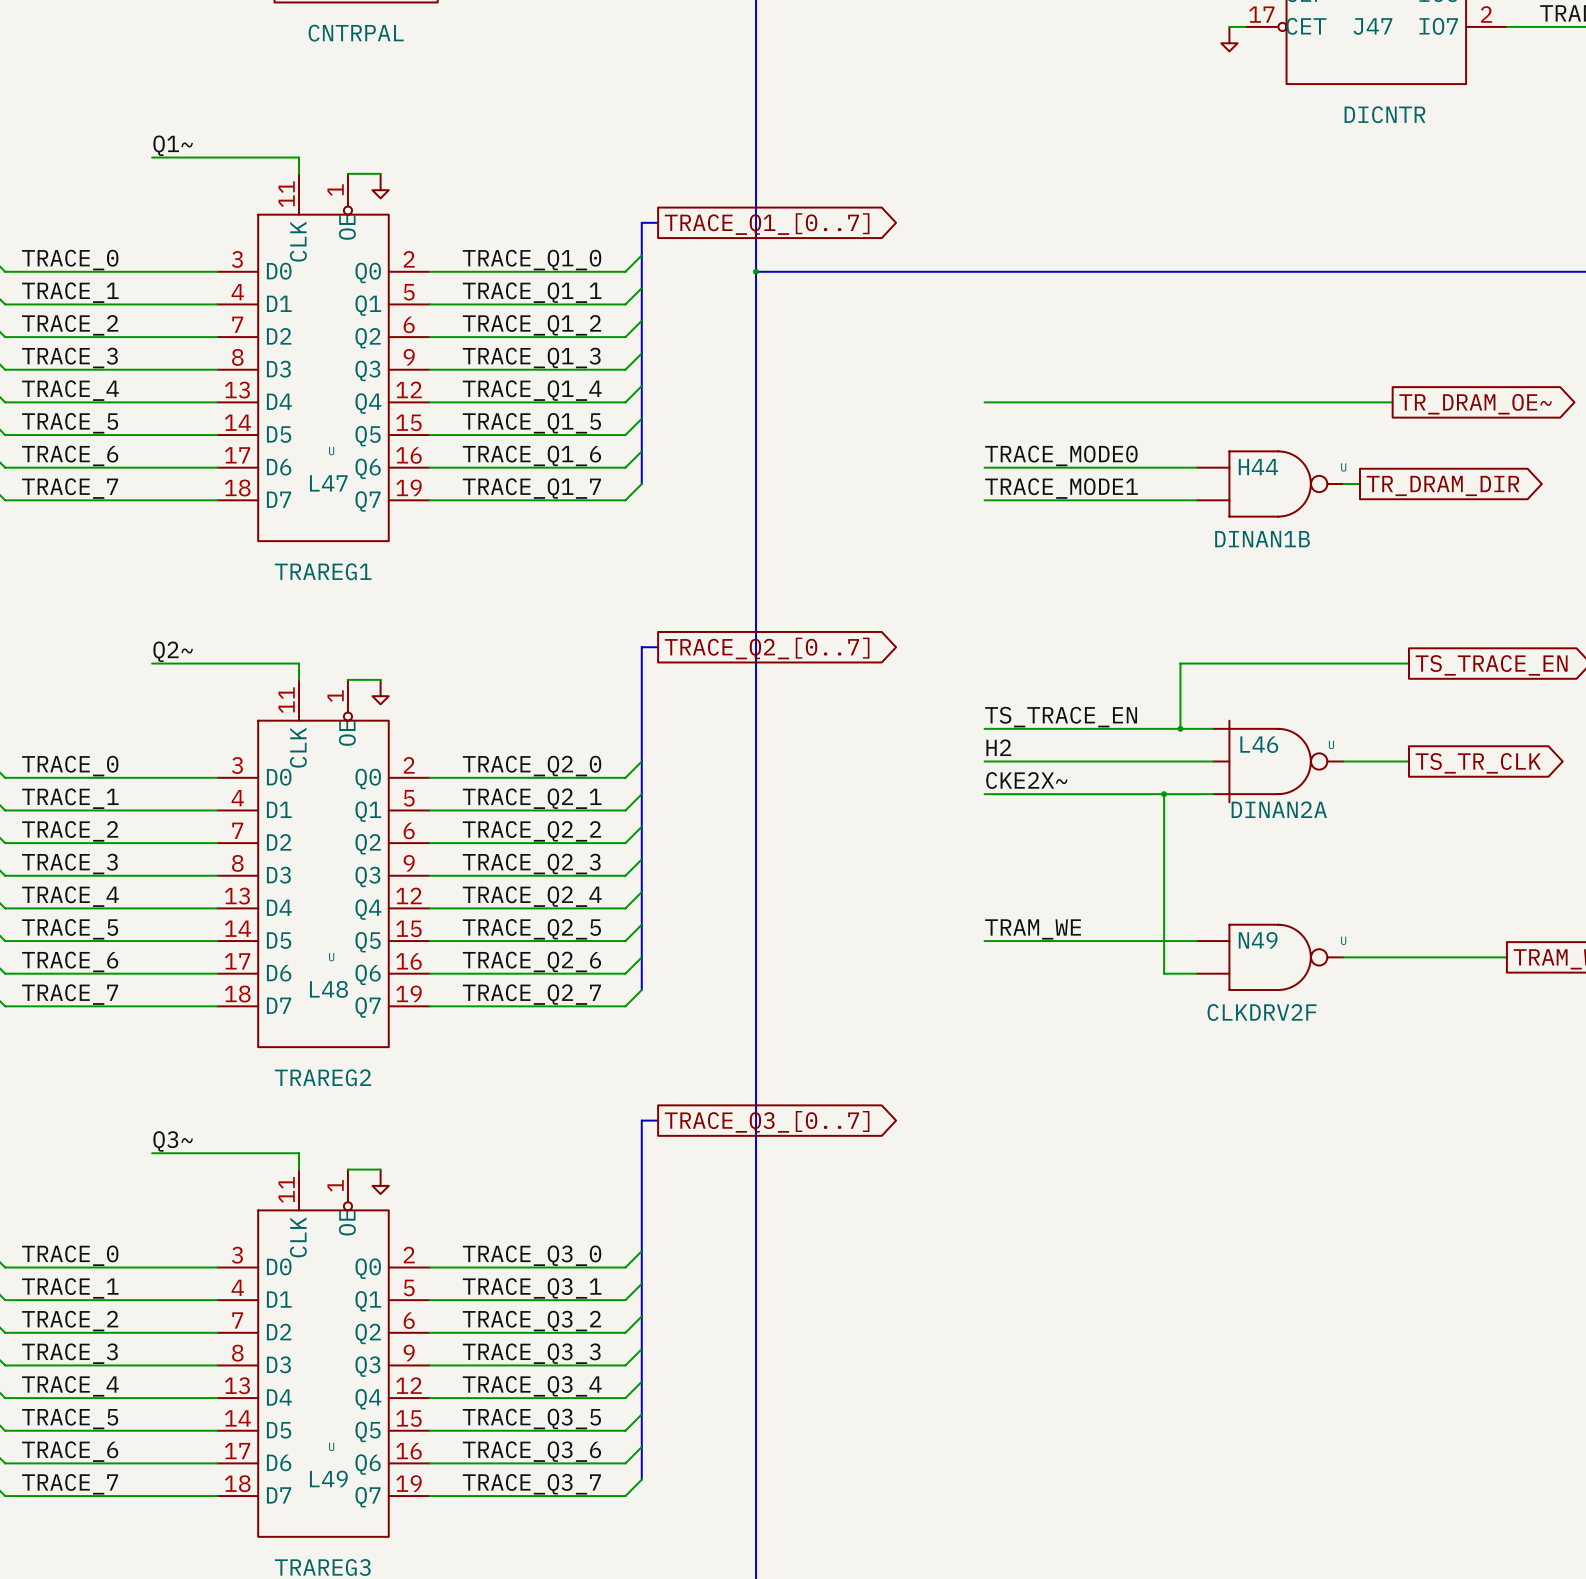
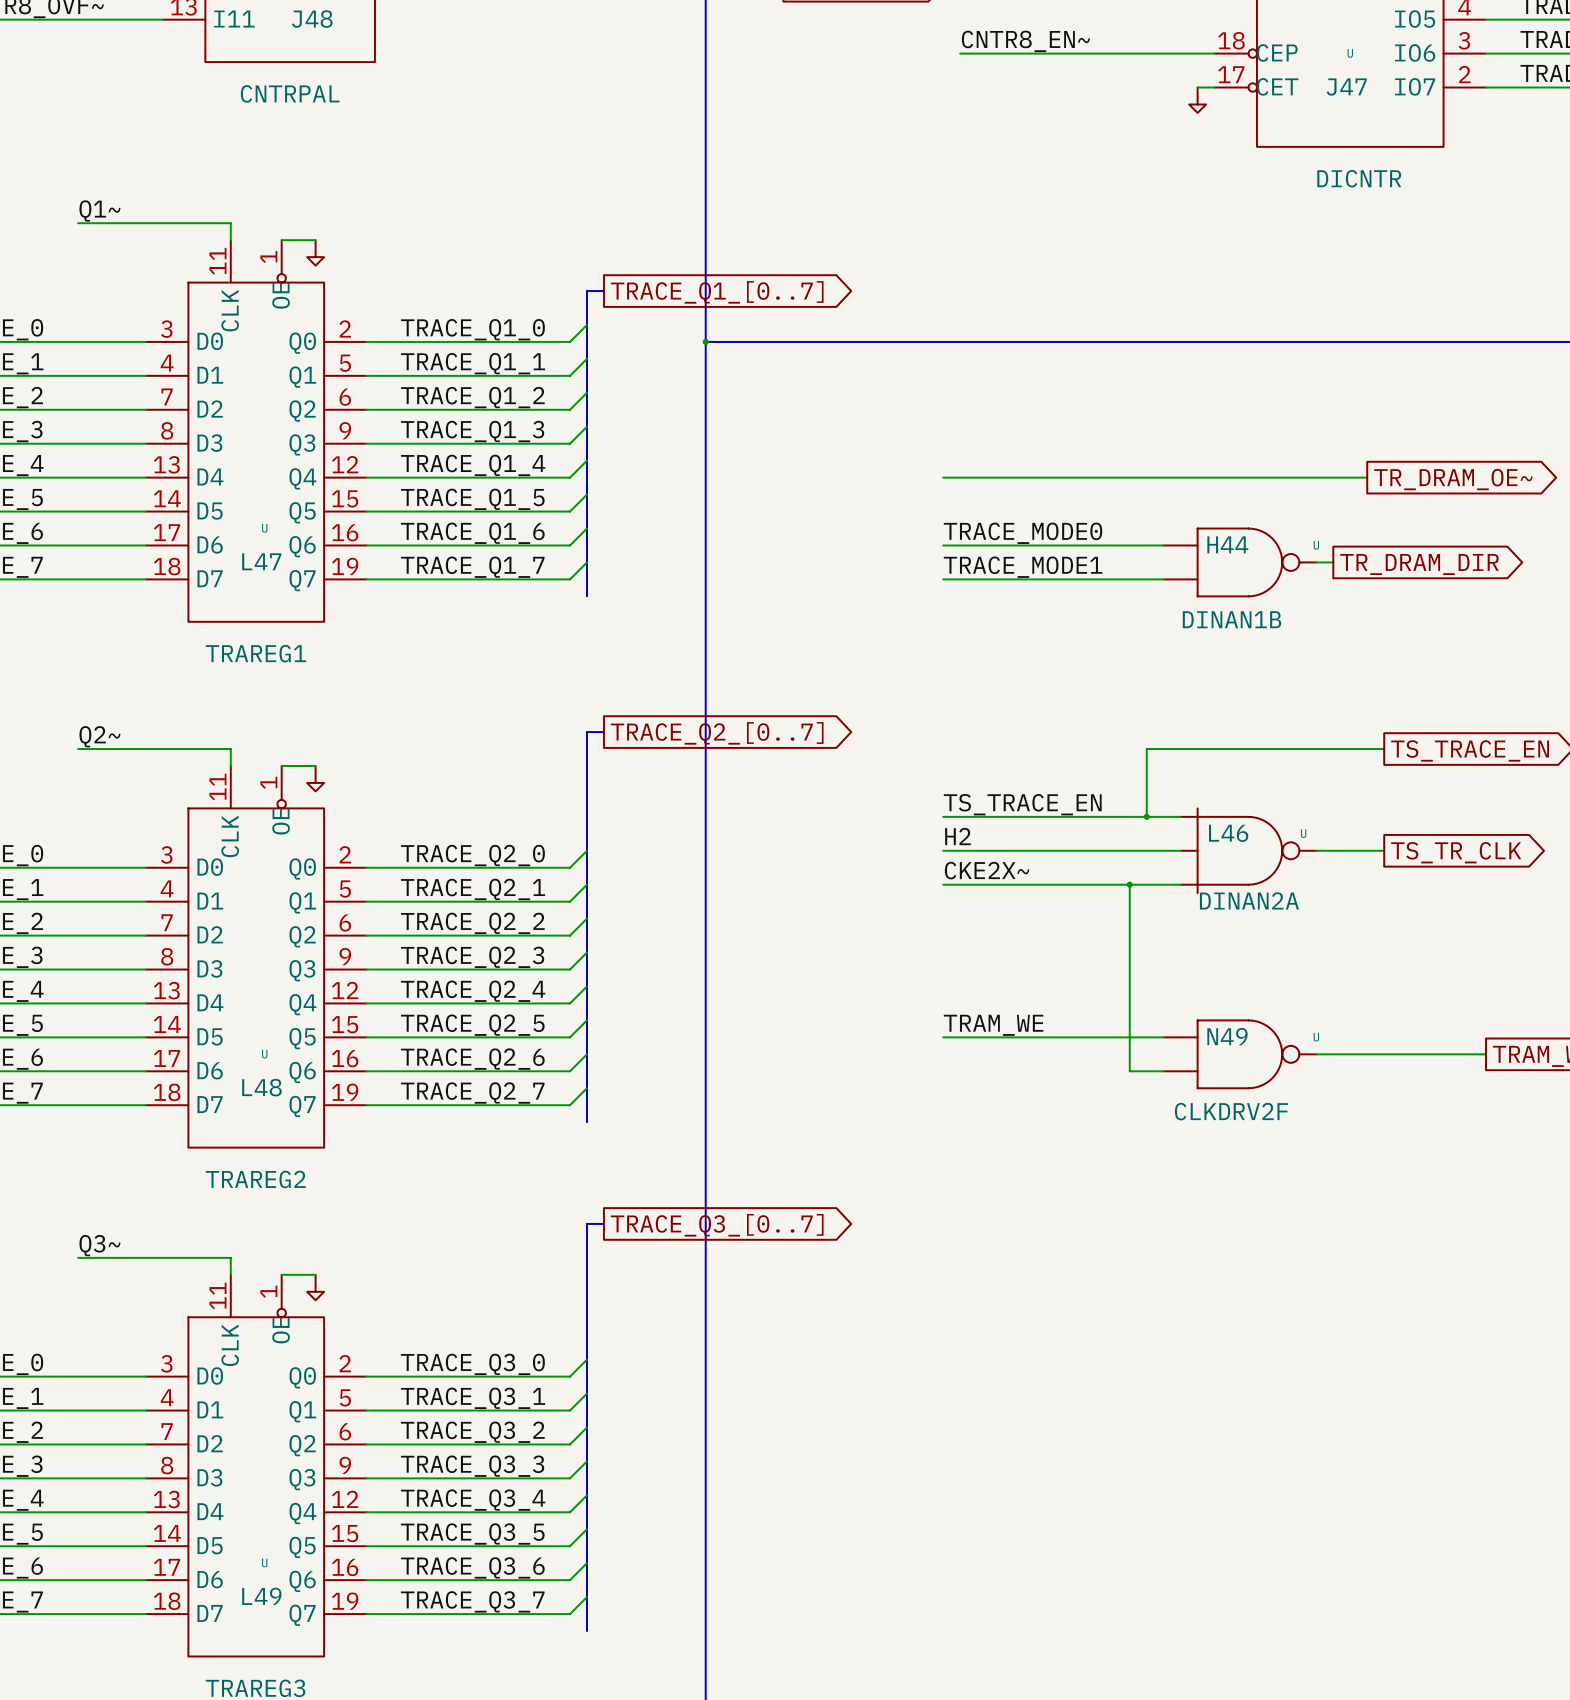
bus: none -> (586, 562) (586, 596)
bus: none -> (586, 1088) (586, 1122)
bus: none -> (586, 1597) (586, 1631)

